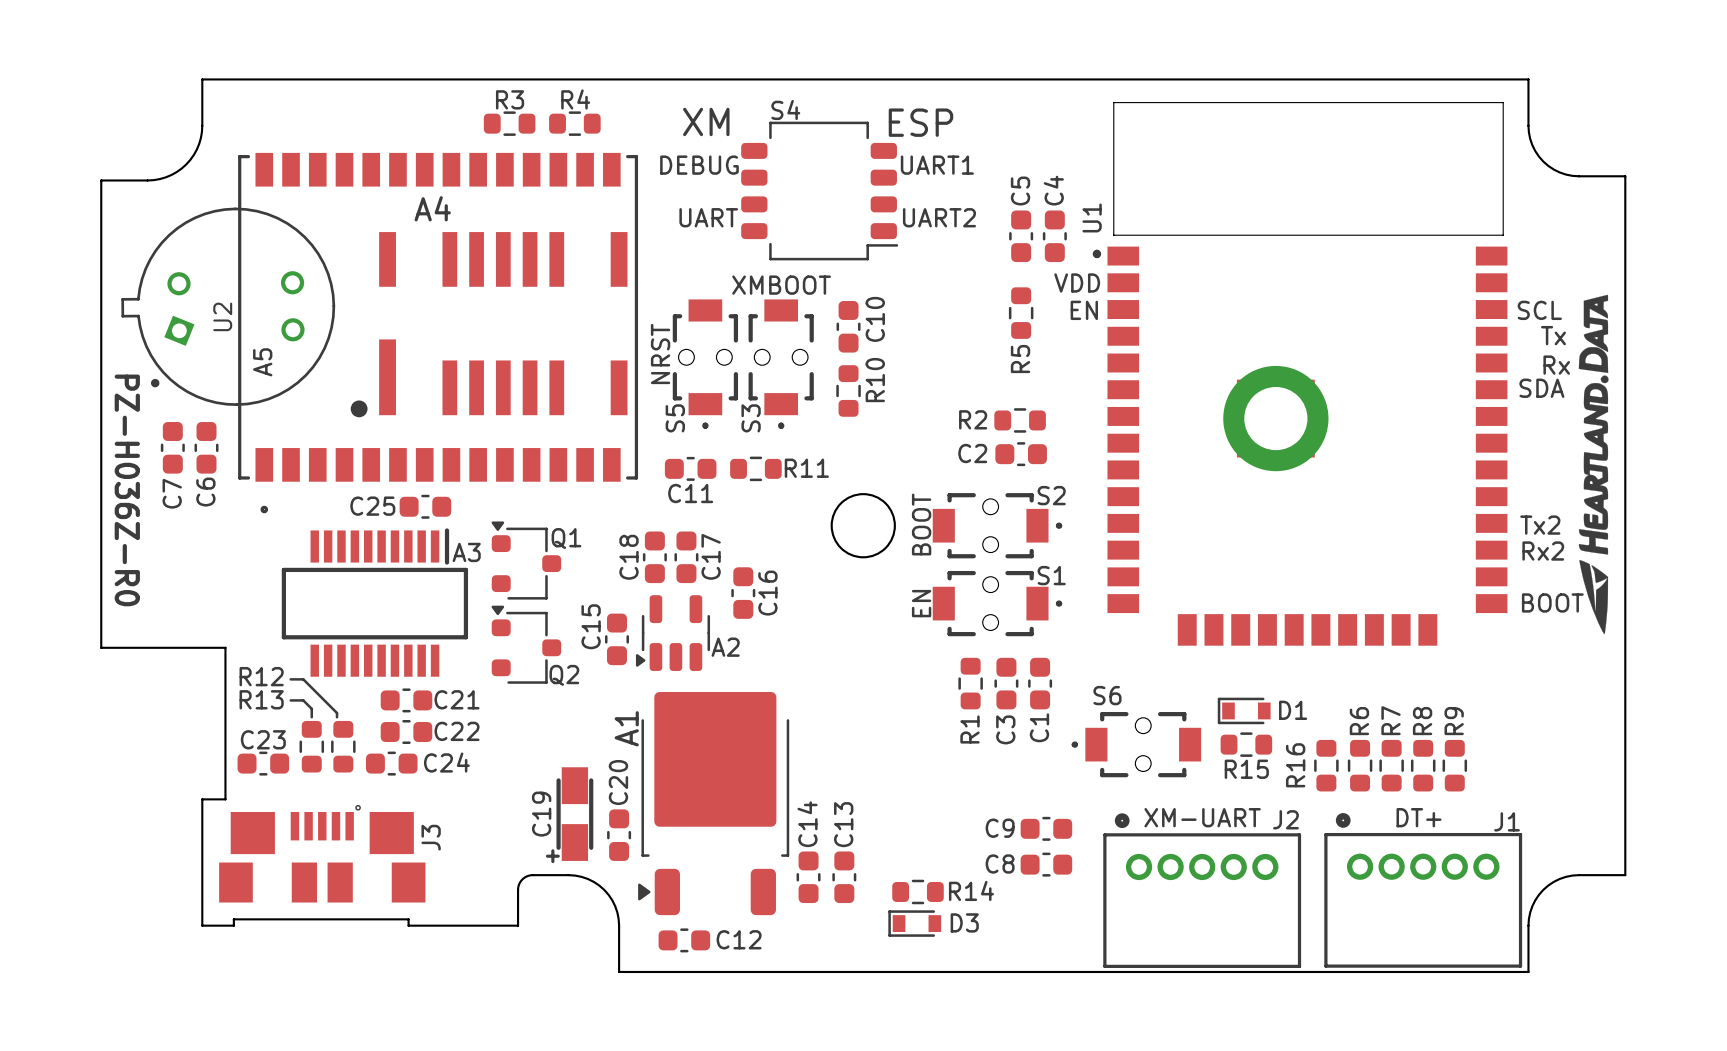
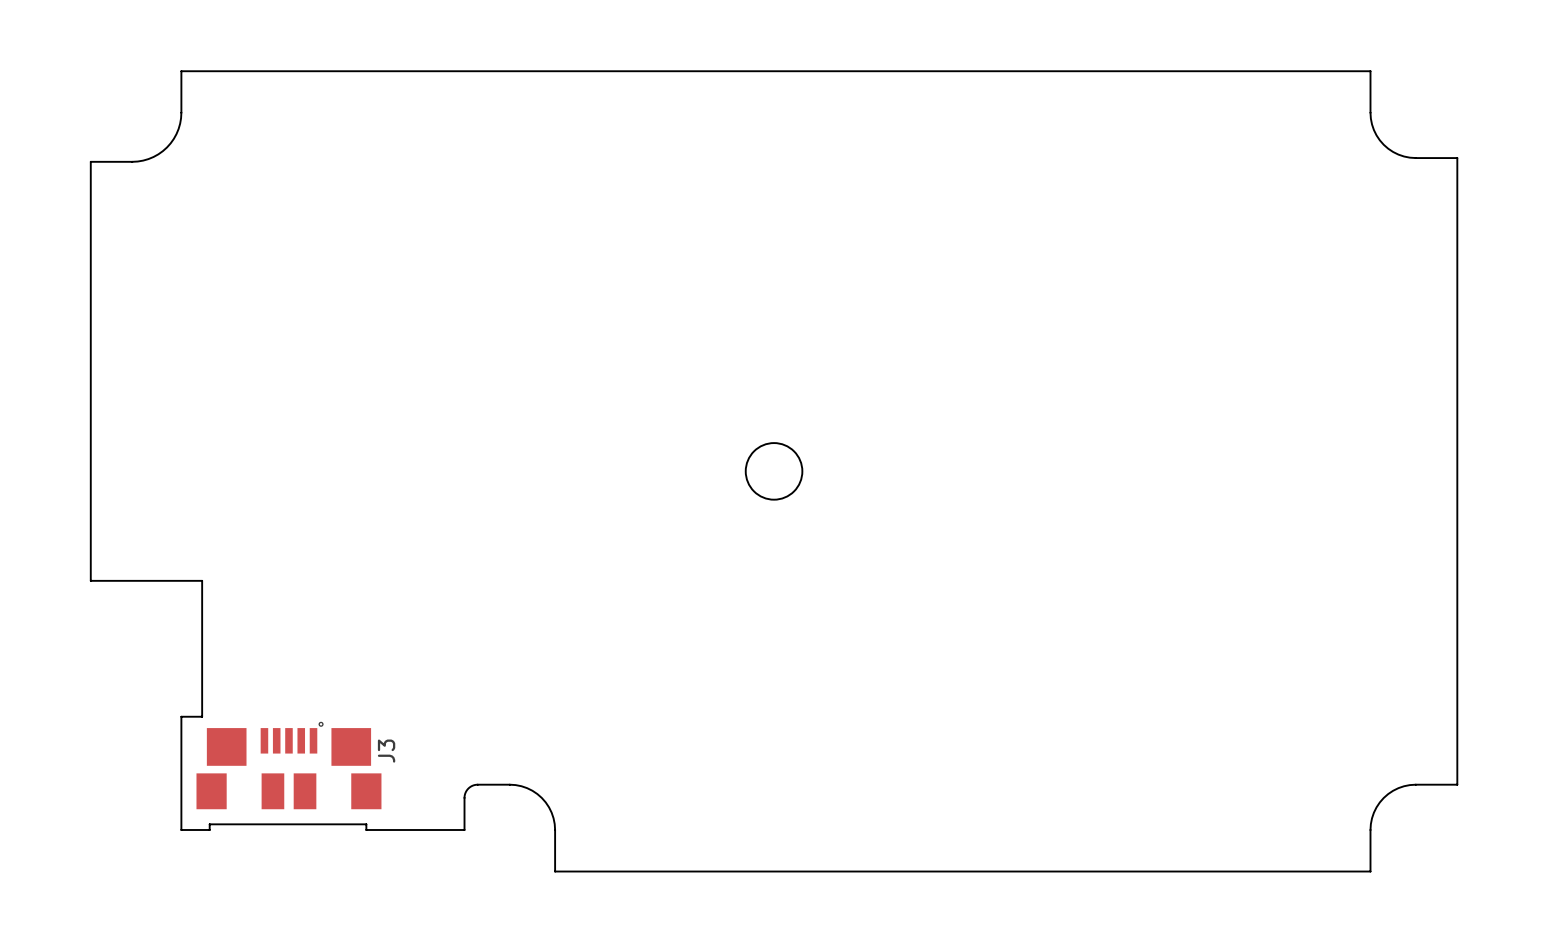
board edge: (1113, 102) (1503, 102) (1503, 235) (1113, 235) (1113, 102) -> none
text: XM (706, 121) -> none
text: ESP (920, 122) -> none
R3: (509, 123) -> none
R4: (574, 123) -> none
text: DEBUG (699, 165) -> none
text: UART1 (937, 165) -> none
S4: (819, 191) -> none
text: UART (708, 217) -> none
text: UART2 (939, 217) -> none
C5: (1021, 236) -> none
C4: (1054, 236) -> none
text: VDD (1077, 283) -> none
text: XMBOOT (781, 285) -> none
drawing: [1578, 294, 1609, 635] -> none
A5: (228, 306) -> none
text: EN (1084, 310) -> none
text: SCL (1539, 310) -> none
R5: (1021, 313) -> none
A4: (489, 324) -> none
C10: (848, 326) -> none
U2: (438, 333) -> none
text: Tx (1553, 335) -> none
text: NRST (660, 354) -> none
S5: (705, 364) -> none
S3: (781, 364) -> none
text: Rx (1556, 365) -> none
text: SDA (1541, 388) -> none
R10: (848, 390) -> none
R2: (1020, 420) -> none
U1: (1300, 446) -> none
C7: (172, 447) -> none
C6: (206, 447) -> none
C2: (1021, 454) -> none
C11: (690, 468) -> none
R11: (755, 468) -> none
text: PZ-H036Z-R0 (127, 490) -> none
C25: (425, 506) -> none
text: BOOT (921, 524) -> none
S2: (997, 525) -> none
text: Tx2 (1540, 525) -> none
text: Rx2 (1543, 551) -> none
C18: (654, 557) -> none
C17: (686, 557) -> none
Q1: (526, 560) -> none
C16: (743, 593) -> none
A3: (374, 602) -> none
text: BOOT (1552, 602) -> none
text: EN (921, 603) -> none
S1: (997, 603) -> none
A2: (672, 633) -> none
C15: (616, 639) -> none
Q2: (526, 644) -> none
line: (290, 679) (303, 679) (337, 713) (337, 717) -> none
R1: (970, 683) -> none
C3: (1006, 683) -> none
C1: (1040, 683) -> none
line: (290, 700) (303, 700) (311, 708) (311, 717) -> none
C21: (406, 700) -> none
D1: (1244, 710) -> none
C22: (406, 732) -> none
S6: (1136, 744) -> none
R15: (1246, 744) -> none
R13: (311, 746) -> none
R12: (343, 746) -> none
C23: (263, 763) -> none
C24: (391, 763) -> none
R16: (1326, 765) -> none
R6: (1360, 765) -> none
R7: (1391, 765) -> none
R8: (1423, 765) -> none
R9: (1454, 765) -> none
A1: (713, 803) -> none
C19: (569, 815) -> none
text: XM-UART (1202, 817) -> none
text: DT+ (1419, 817) -> none
C9: (1046, 828) -> none
C20: (619, 835) -> none
C8: (1046, 864) -> none
C14: (808, 877) -> none
C13: (844, 877) -> none
J2: (1202, 890) -> none
J1: (1423, 890) -> none
R14: (918, 891) -> none
D3: (914, 923) -> none
C12: (684, 940) -> none

